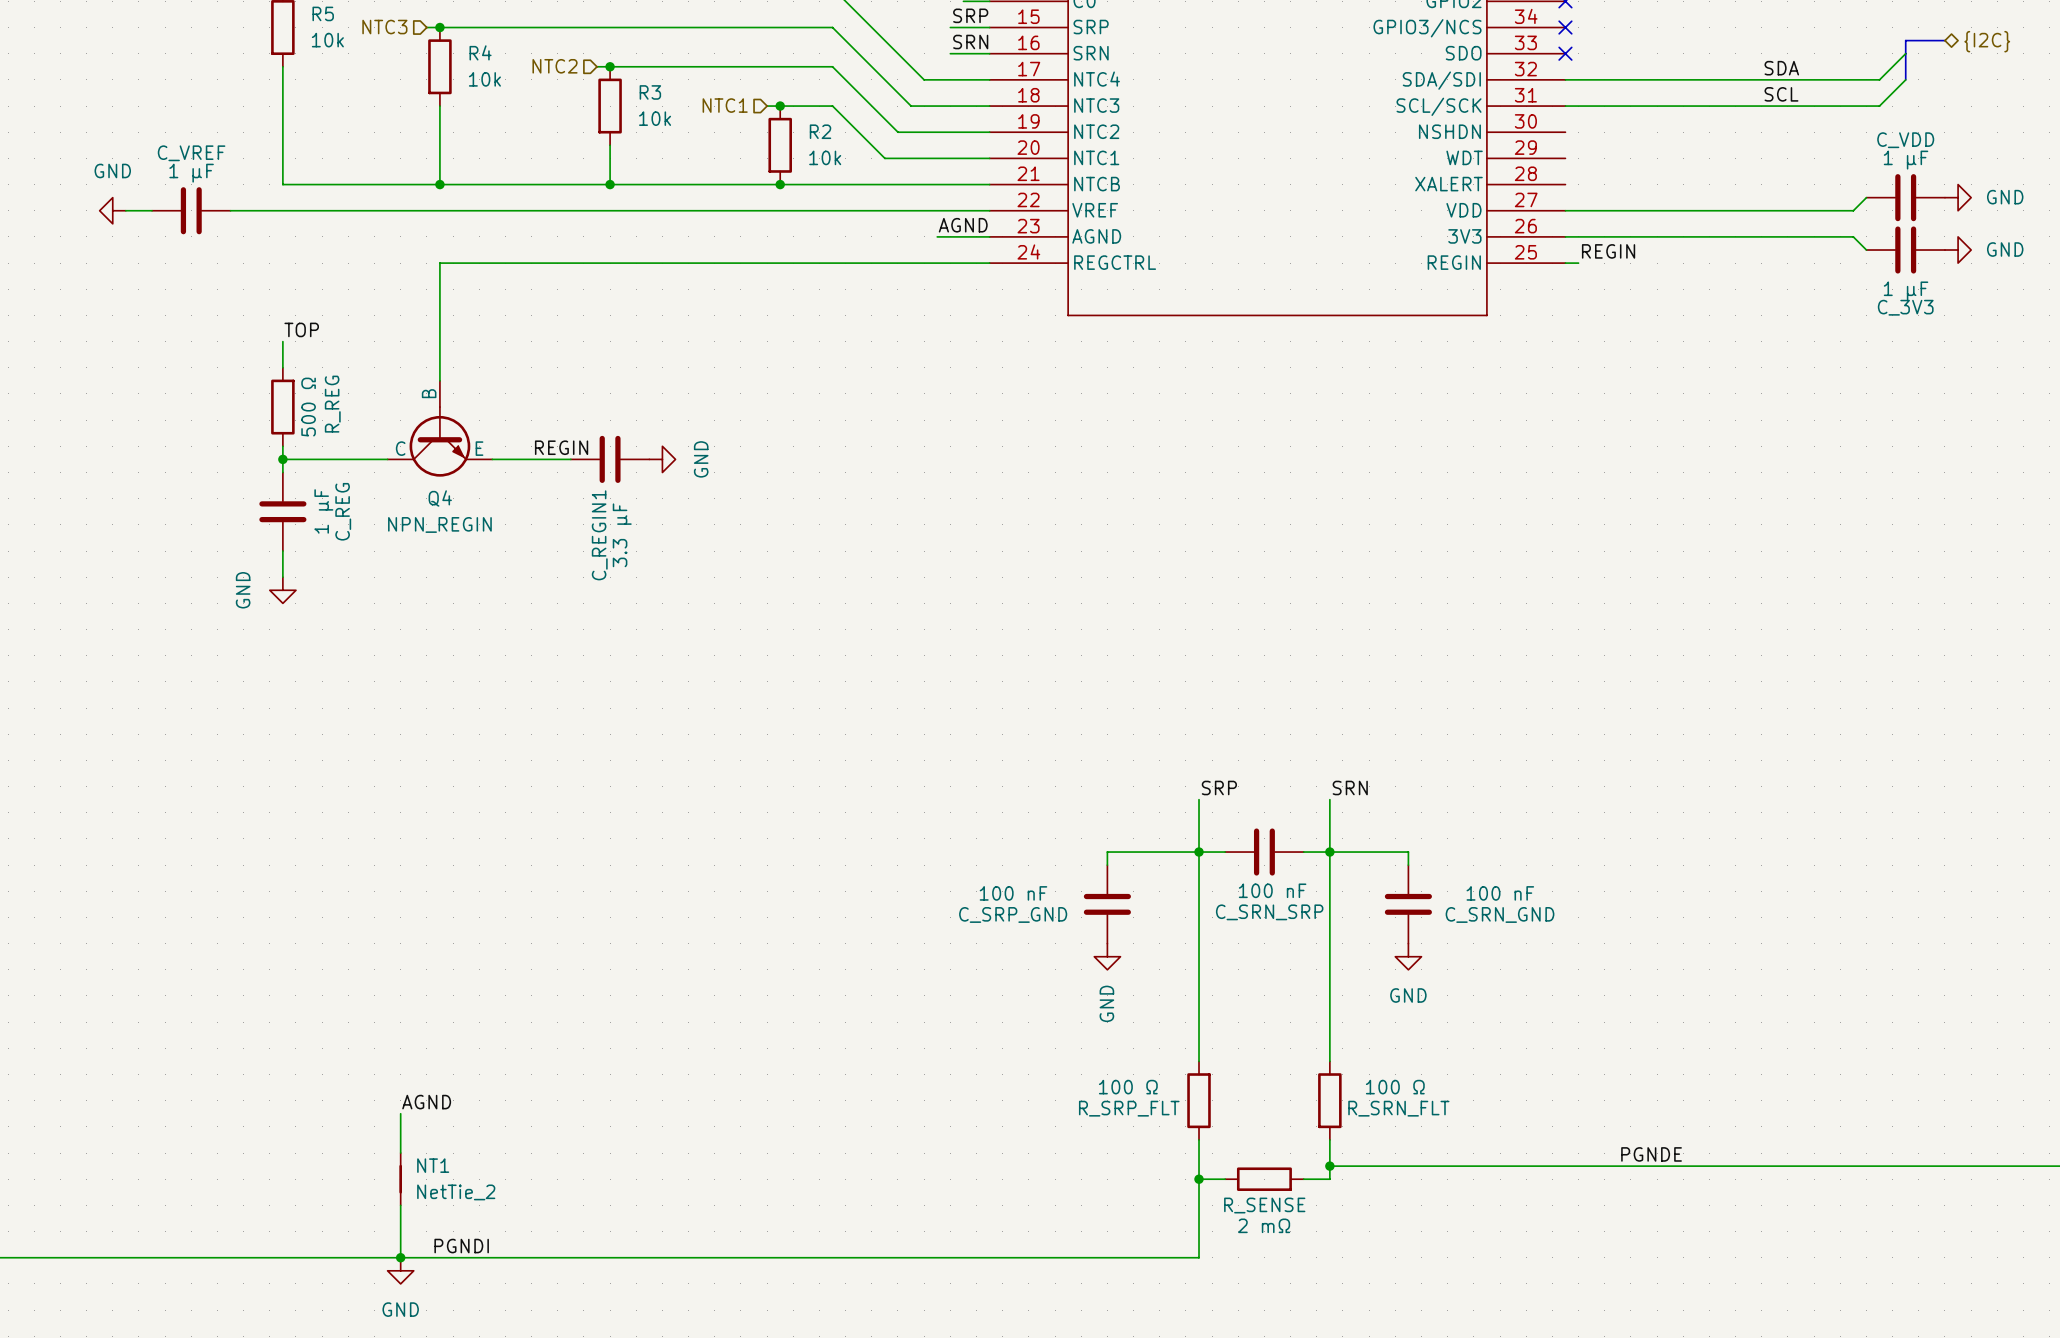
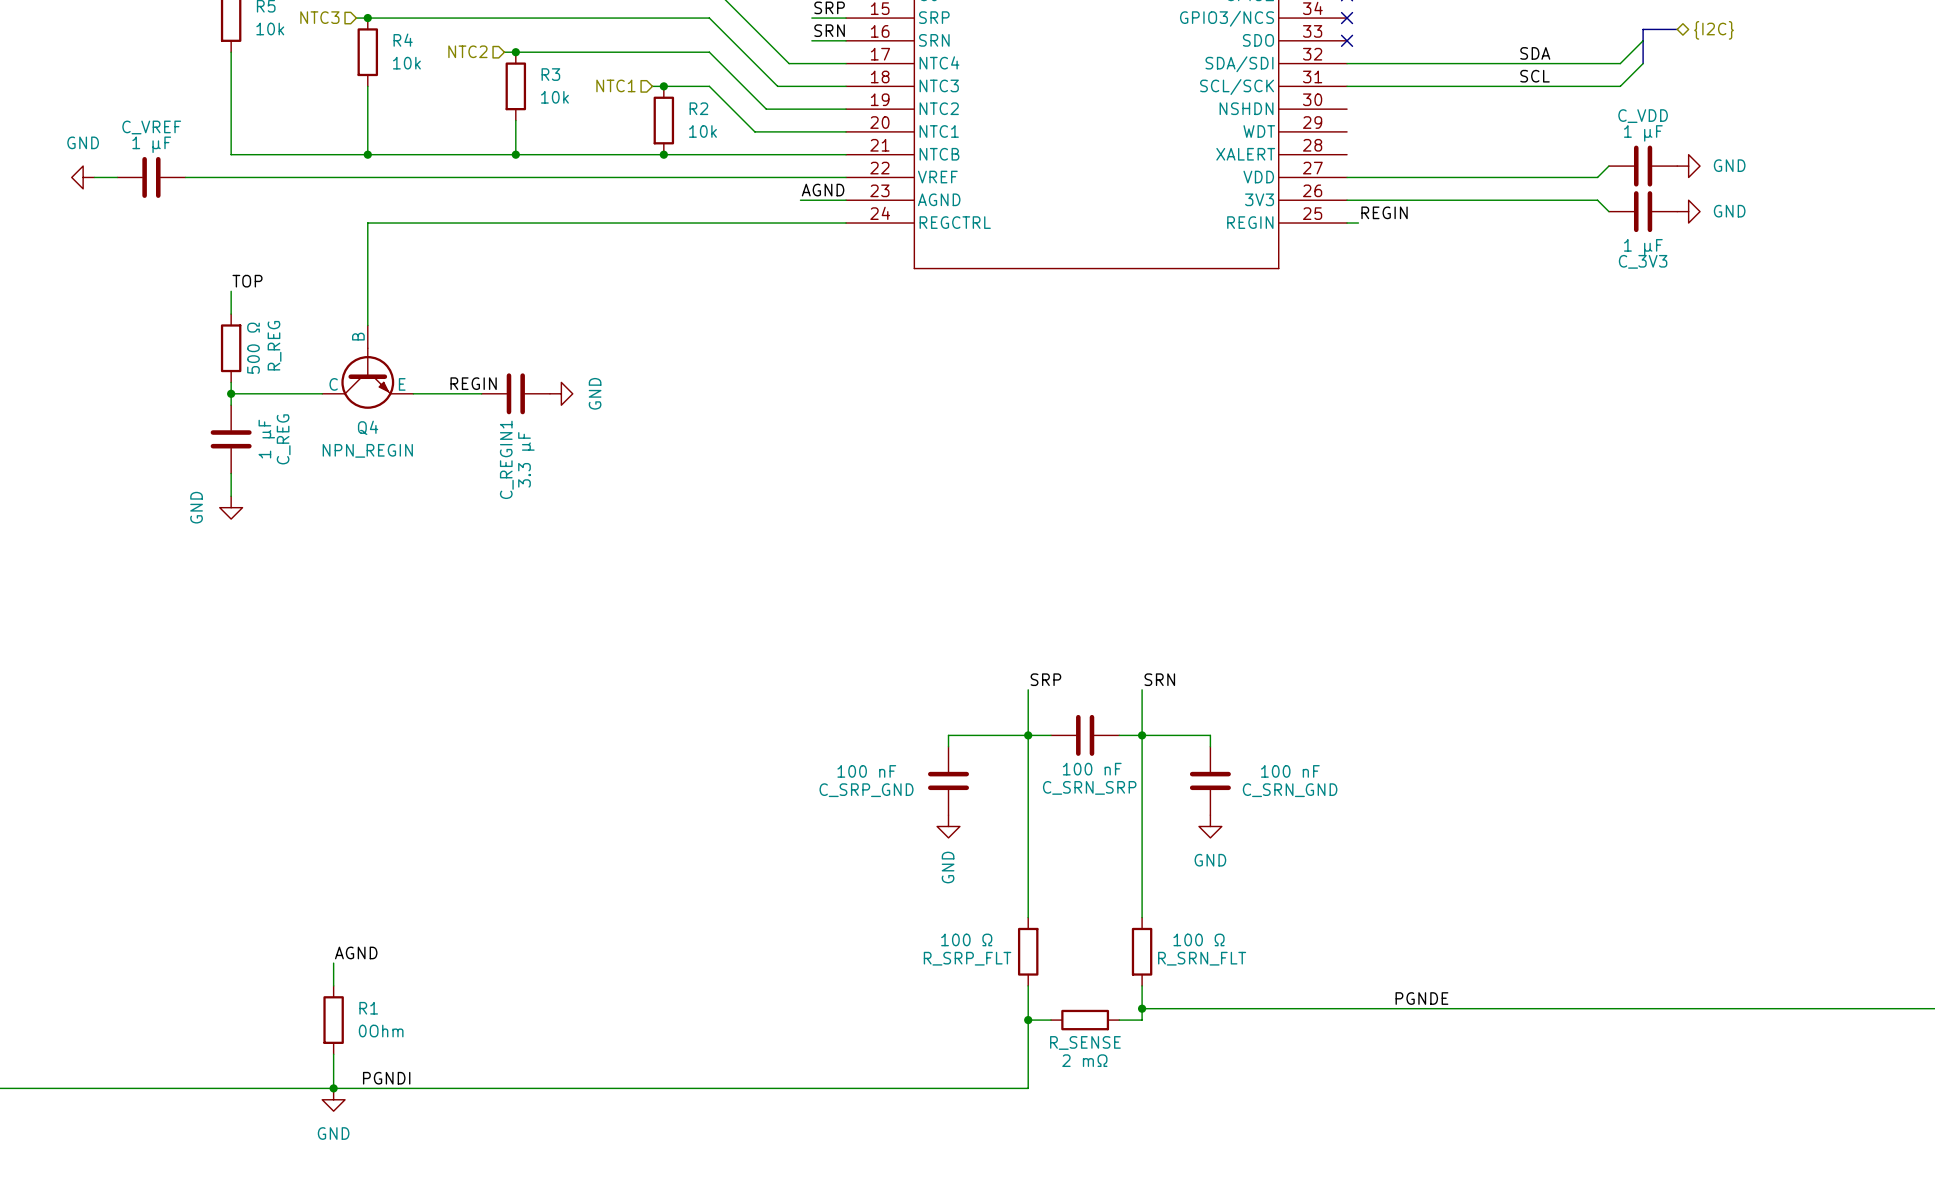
NT1: NetTie_2 (400, 1179) -> none
R1: none -> 0Ohm (333, 1020)

